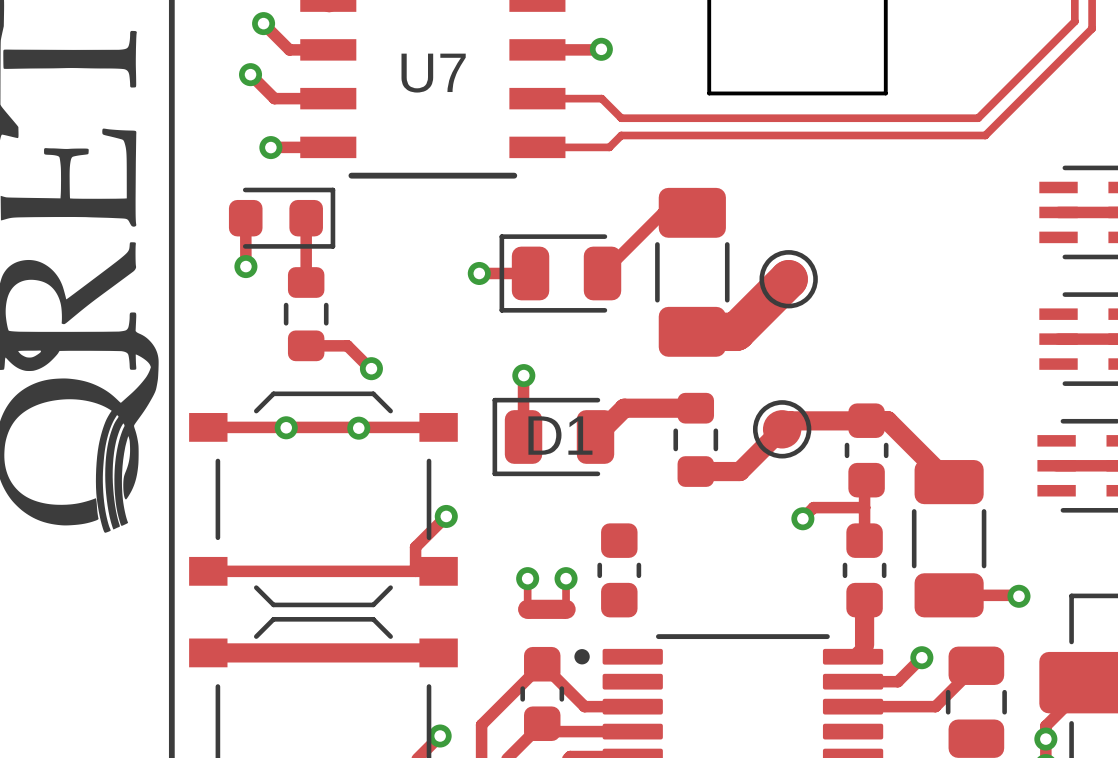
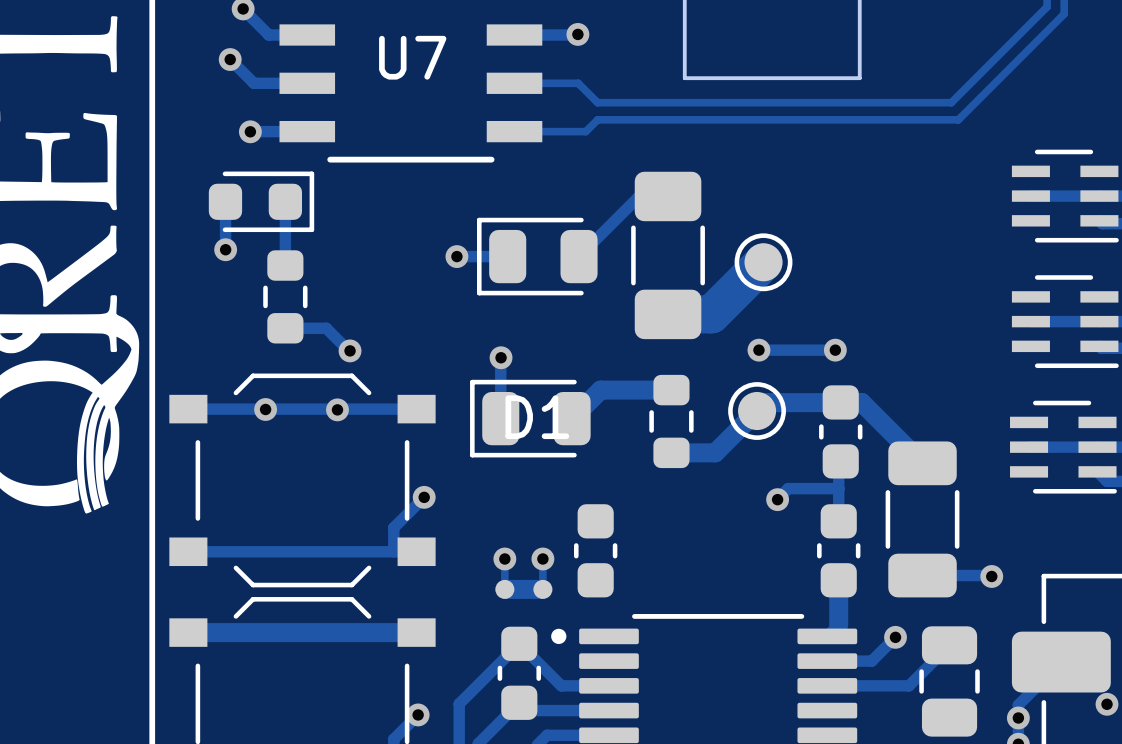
track: none -> (758, 350) (835, 350)
via: none -> (758, 350)
via: none -> (835, 350)

